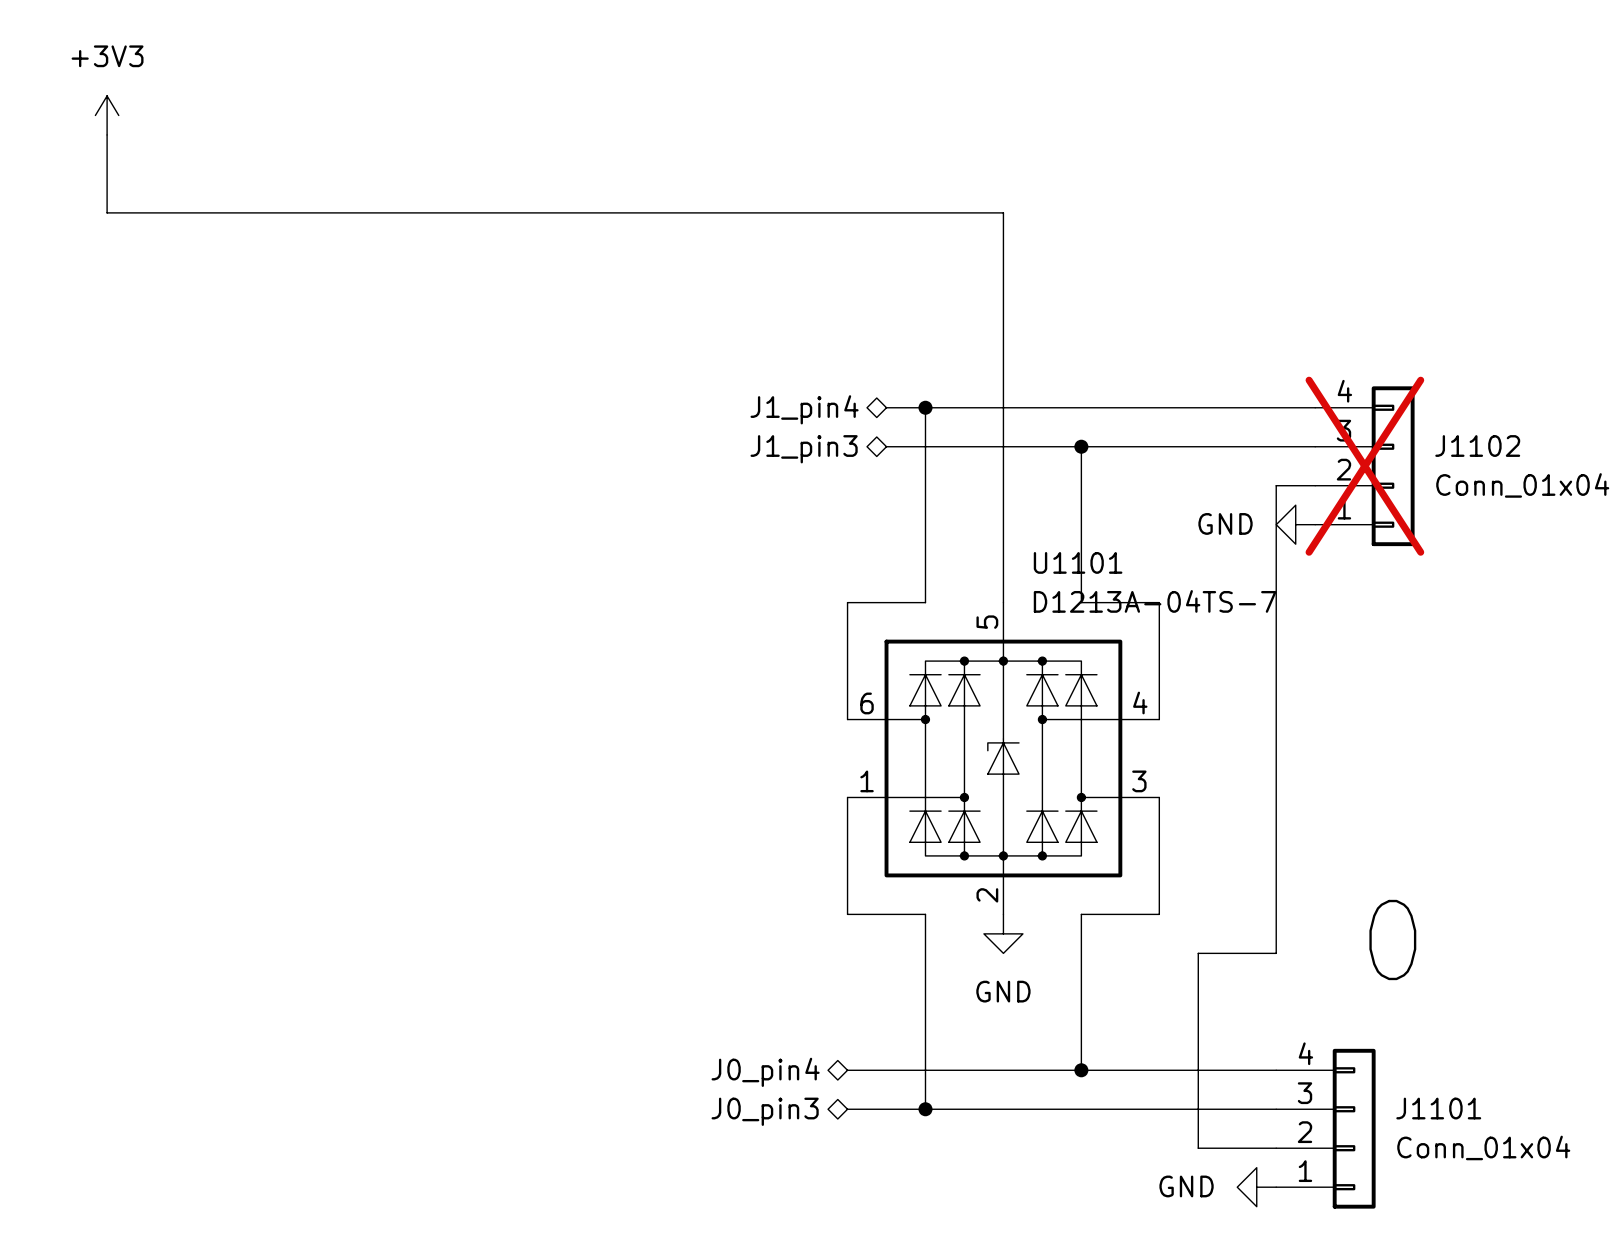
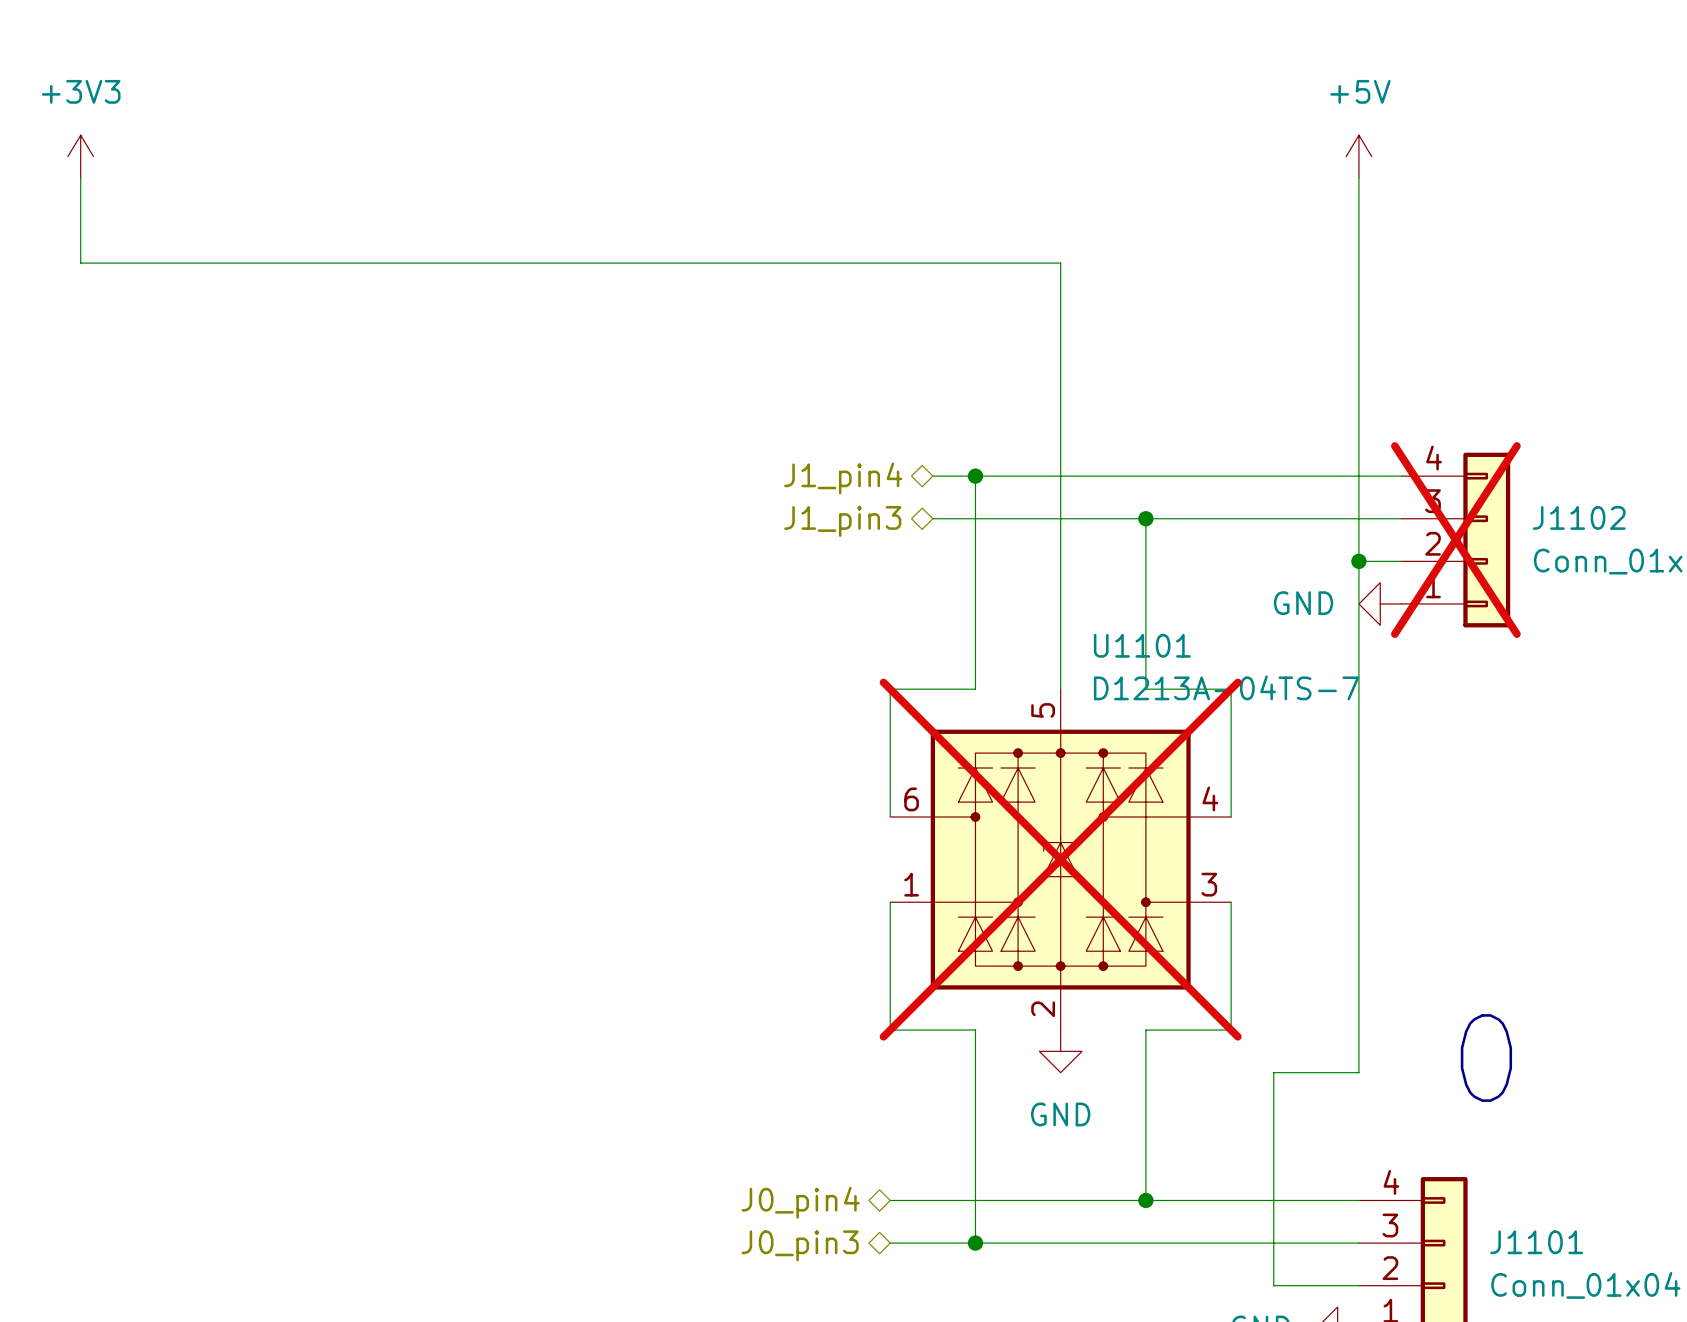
power symbol: none -> +5V (1358, 156)
wire: none -> (1358, 177) (1358, 561)
junction: none -> (1358, 561)
U1101 do-not-place cross: none -> (1060, 859)

